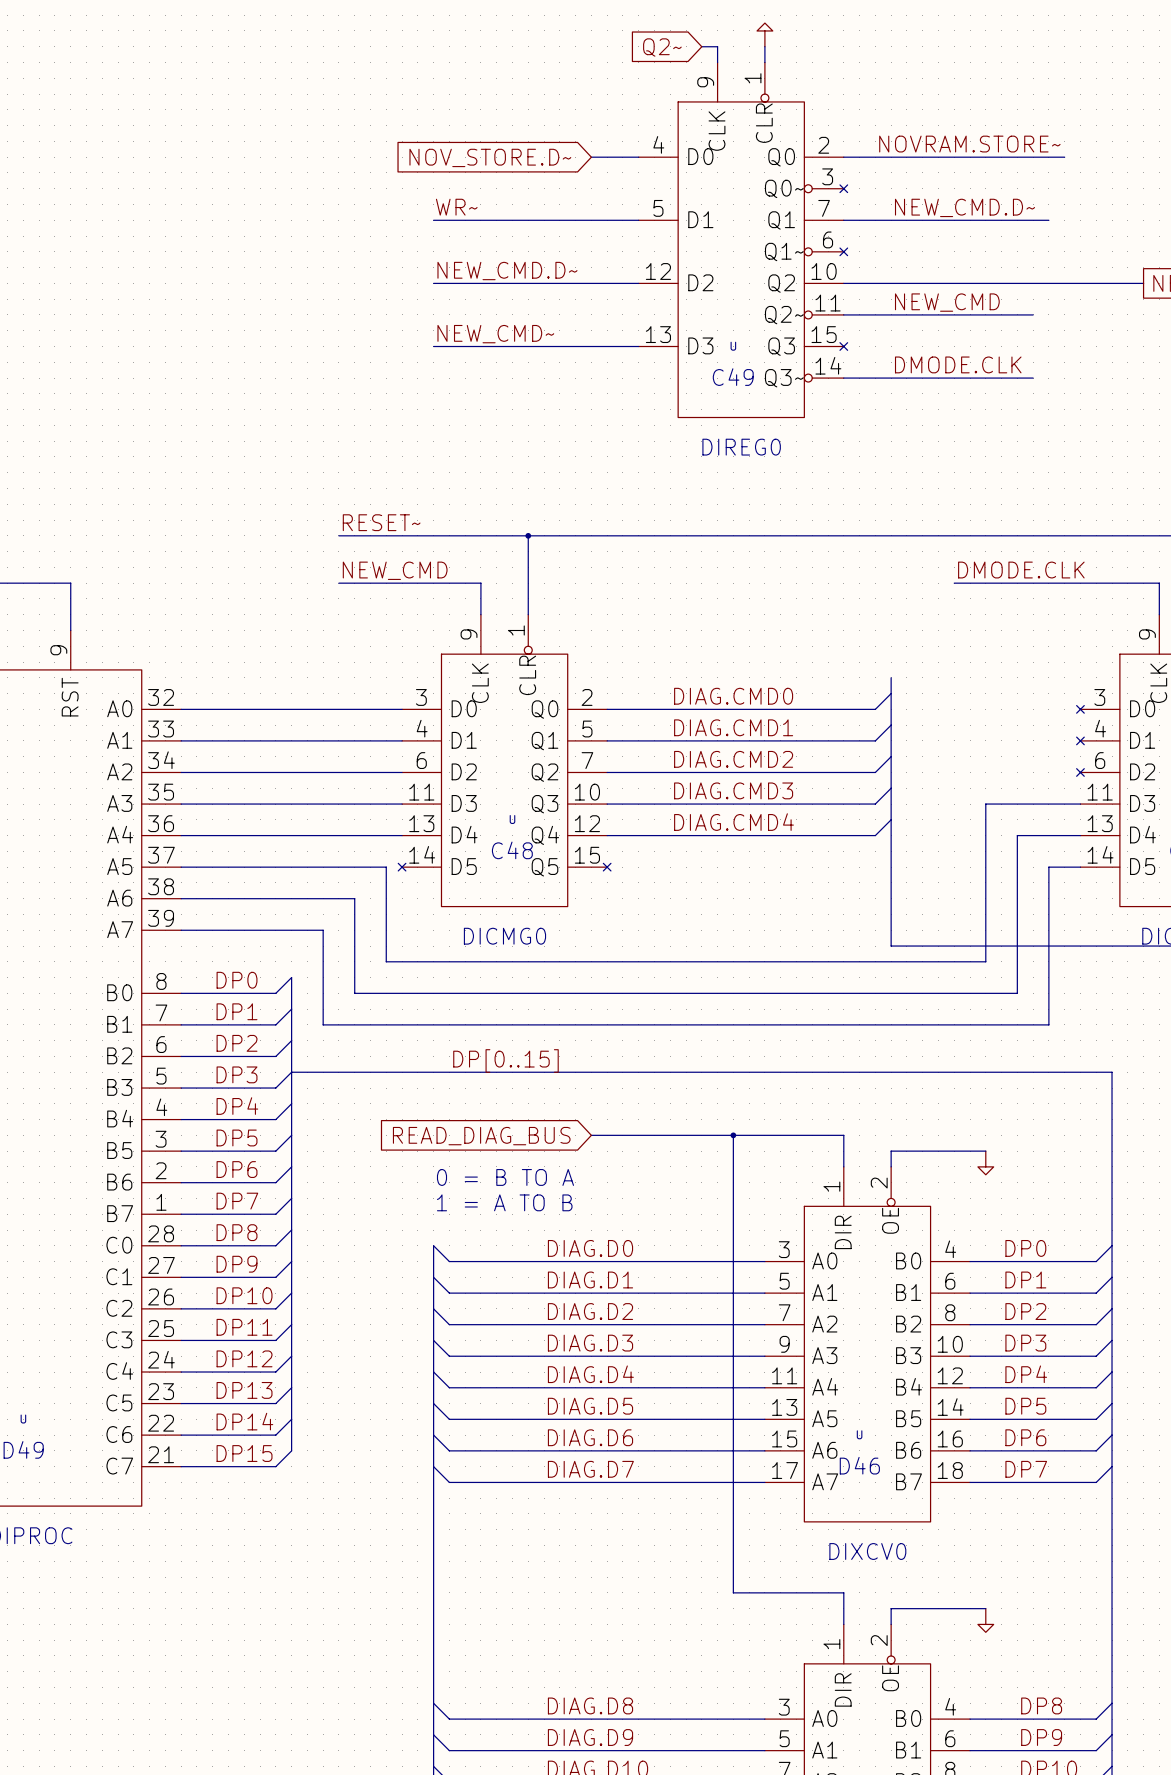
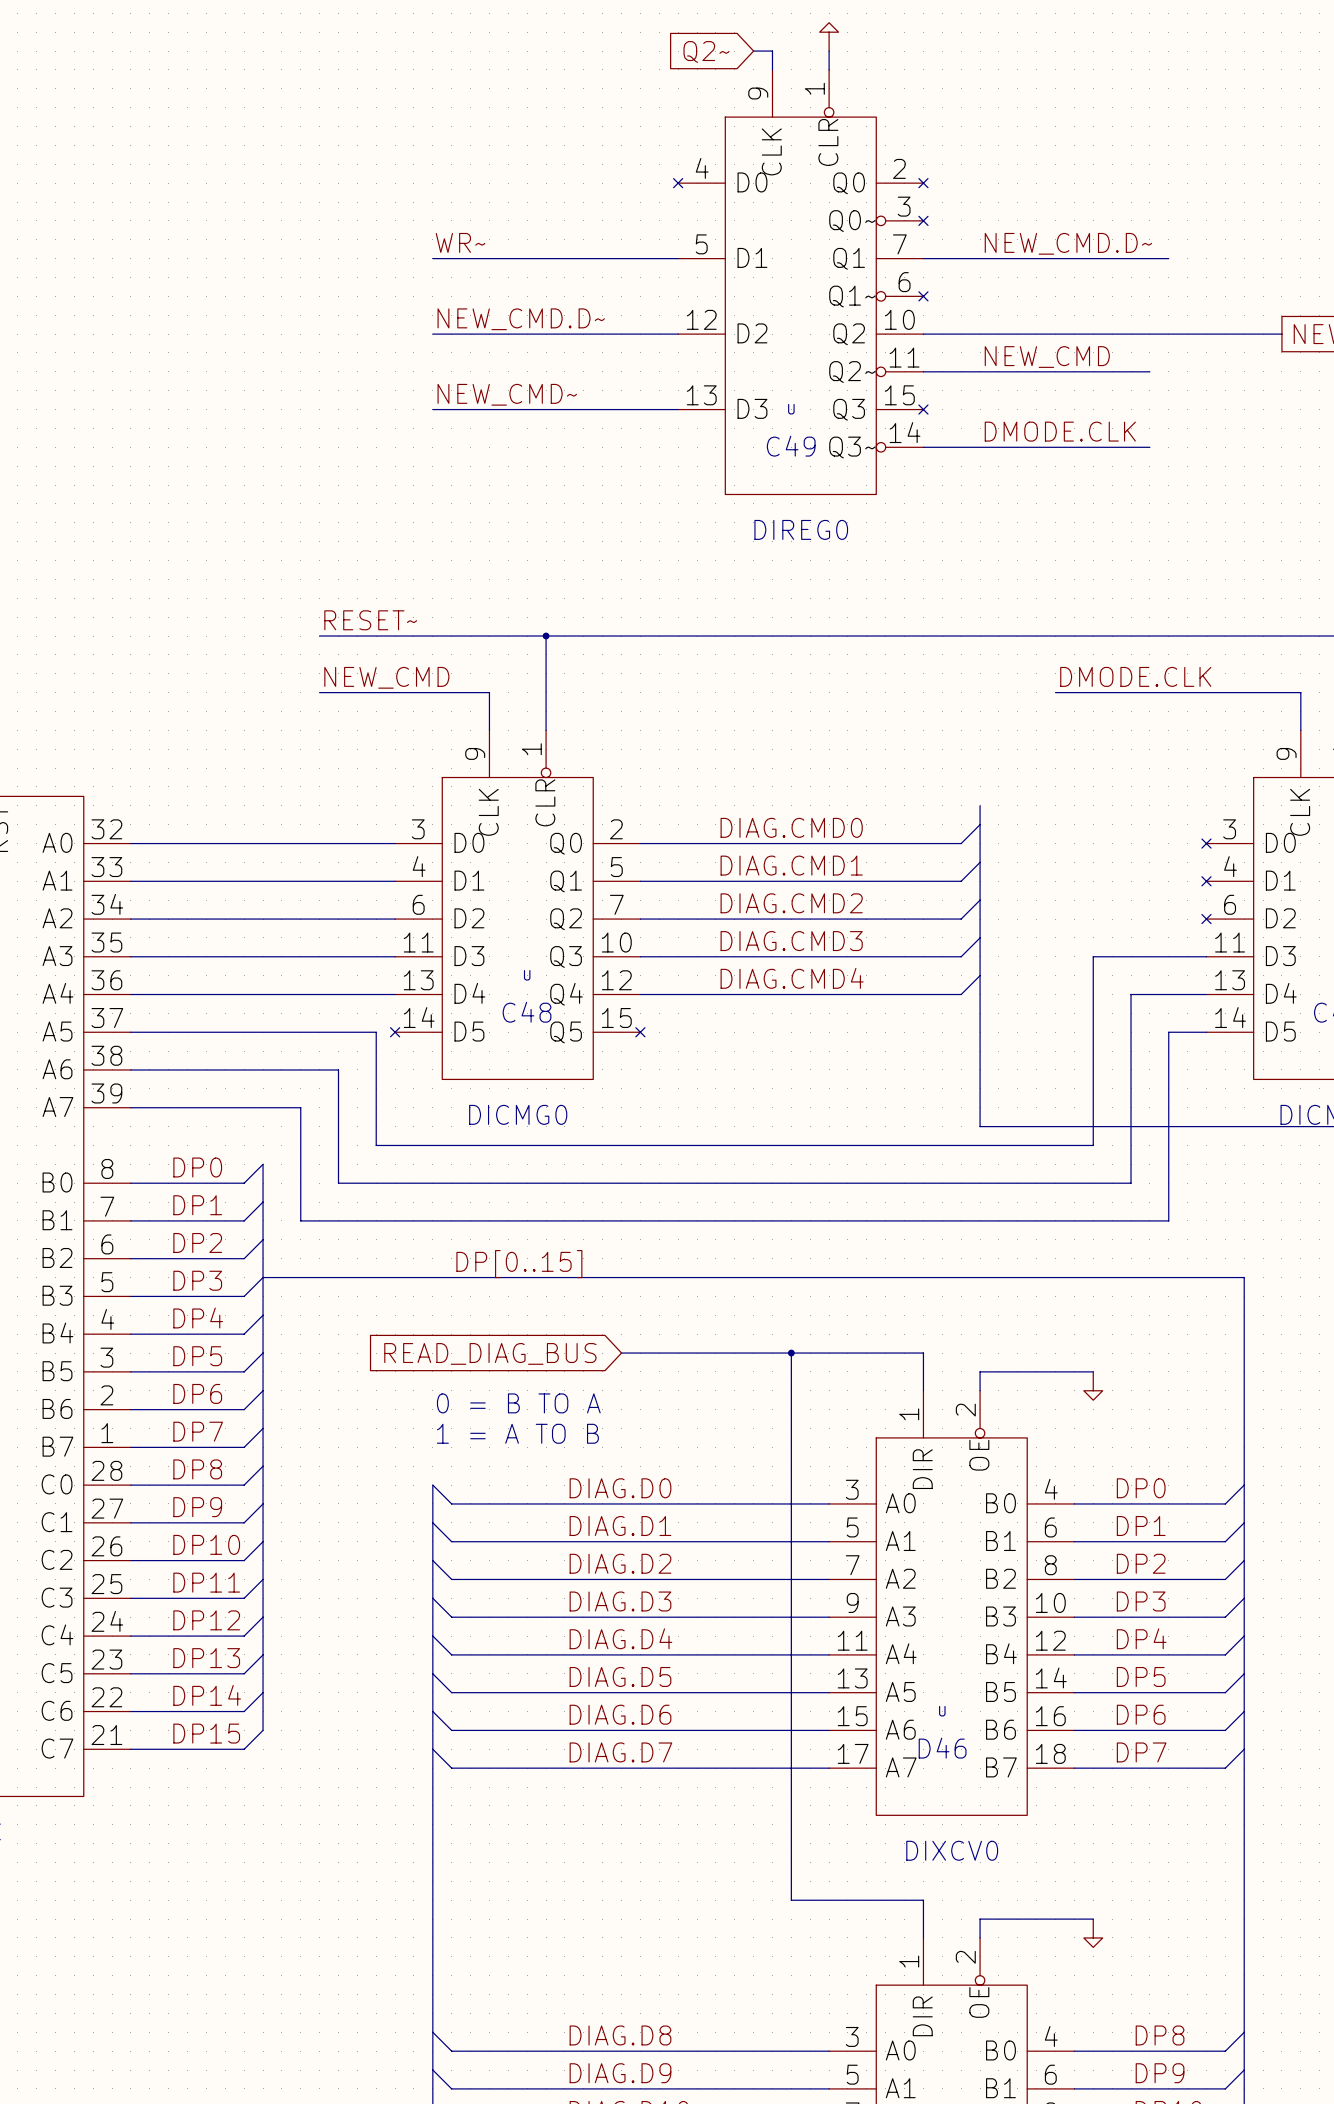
label: NOVRAM.STORE~ (969, 144) -> none
global label: NOV_STORE.D~ (490, 157) -> none
wire: (591, 157) (638, 157) -> none
no-connect mark: none -> (678, 183)
wire: (843, 157) (1064, 157) -> none
no-connect mark: none -> (923, 183)

